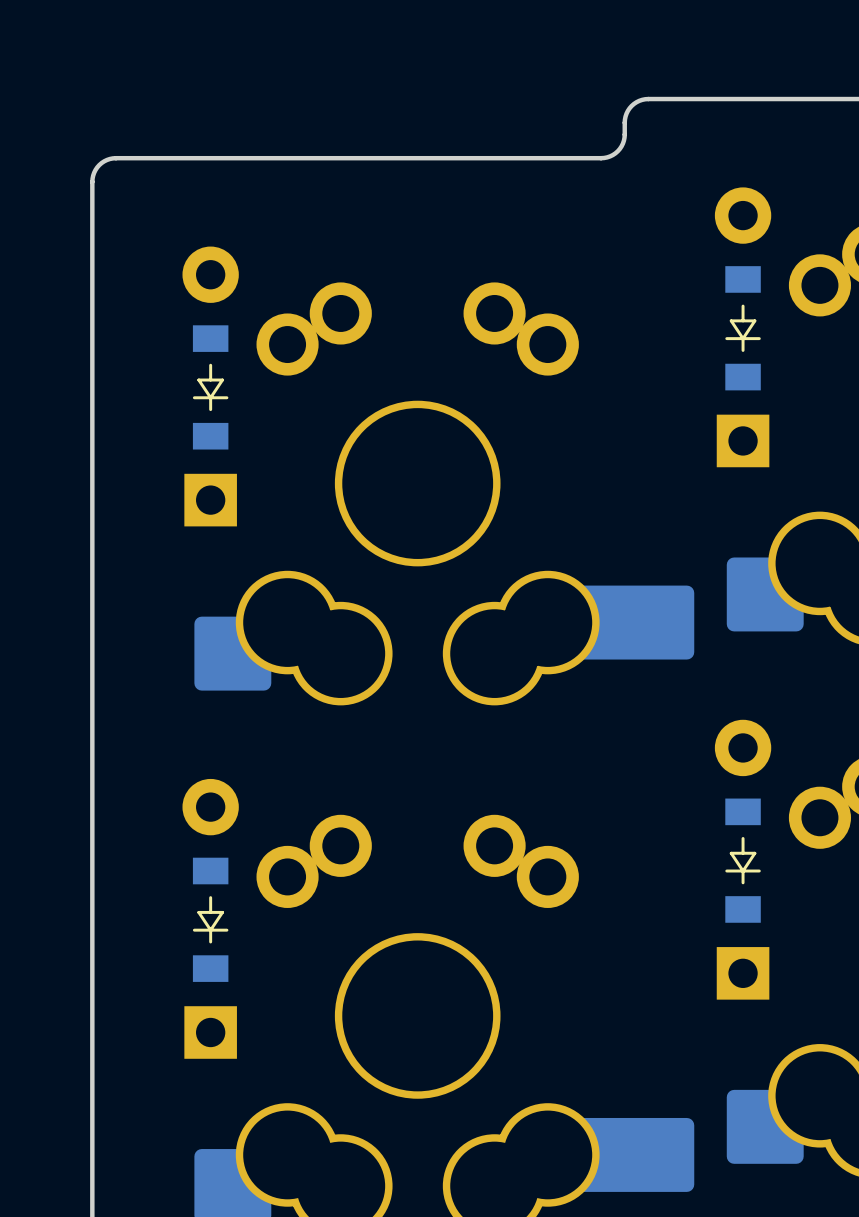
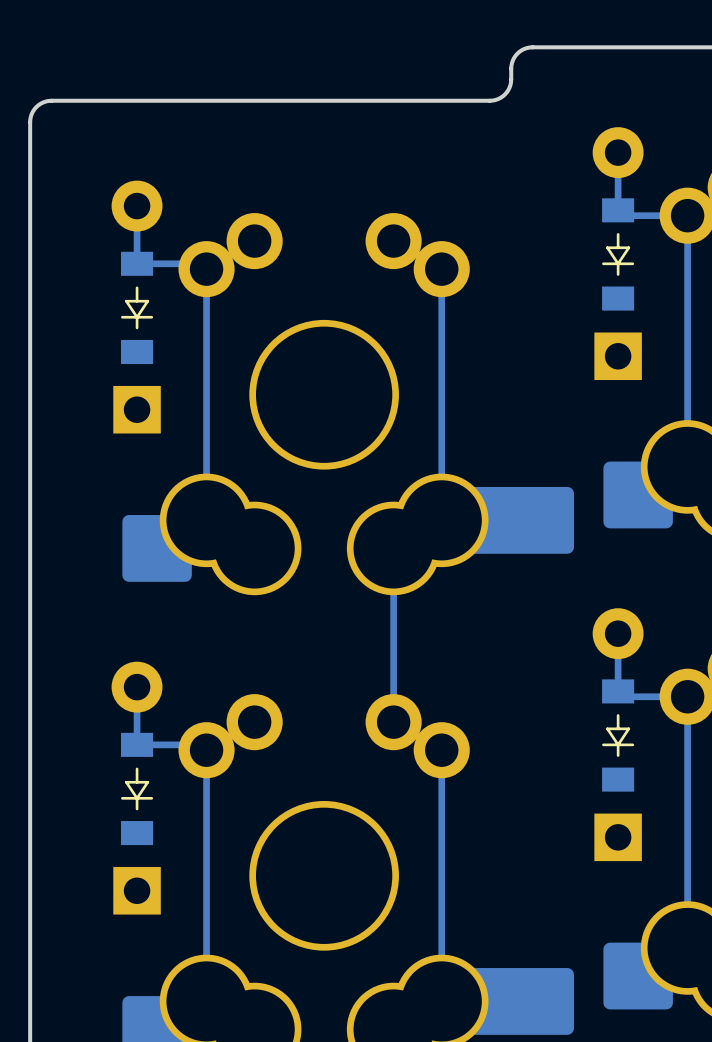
track: none -> (618, 152) (618, 210) (623, 215) (687, 215) (687, 466)
track: none -> (137, 206) (137, 263) (201, 263) (206, 269) (206, 520)
track: none -> (441, 269) (441, 520)
track: none -> (393, 548) (393, 722)
track: none -> (618, 633) (618, 691) (623, 696) (687, 696) (687, 947)
track: none -> (137, 687) (137, 744) (201, 744) (206, 750) (206, 1001)
track: none -> (441, 750) (441, 1001)

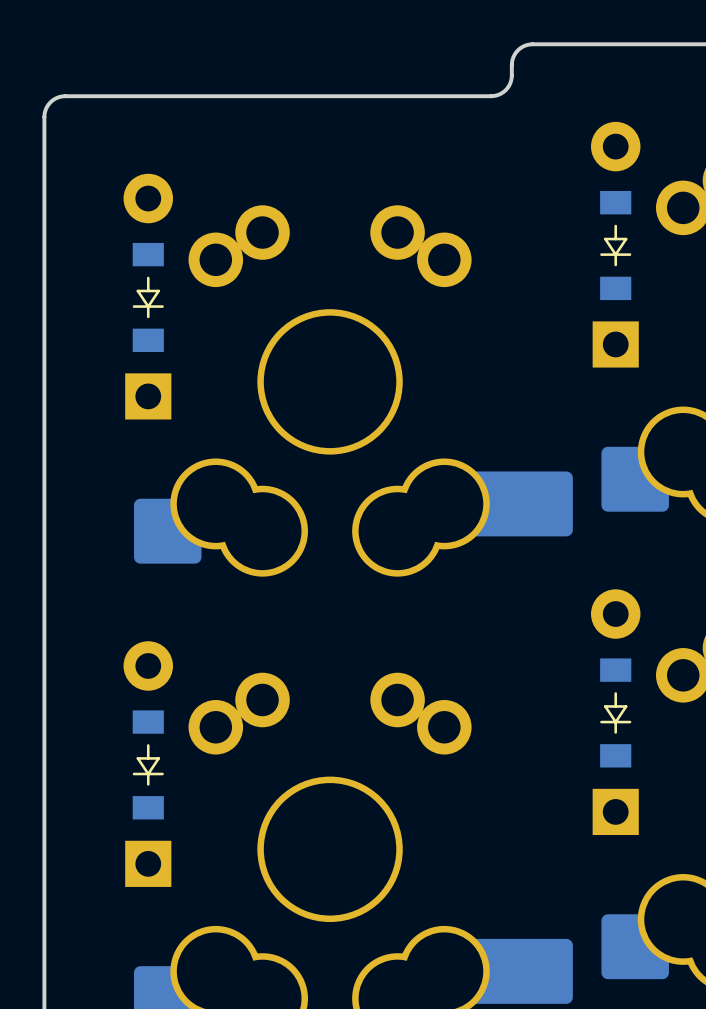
track: (618, 152) (618, 210) (623, 215) (687, 215) (687, 466) -> none
track: (137, 206) (137, 263) (201, 263) (206, 269) (206, 520) -> none
track: (441, 269) (441, 520) -> none
track: (393, 548) (393, 722) -> none
track: (618, 633) (618, 691) (623, 696) (687, 696) (687, 947) -> none
track: (137, 687) (137, 744) (201, 744) (206, 750) (206, 1001) -> none
track: (441, 750) (441, 1001) -> none

